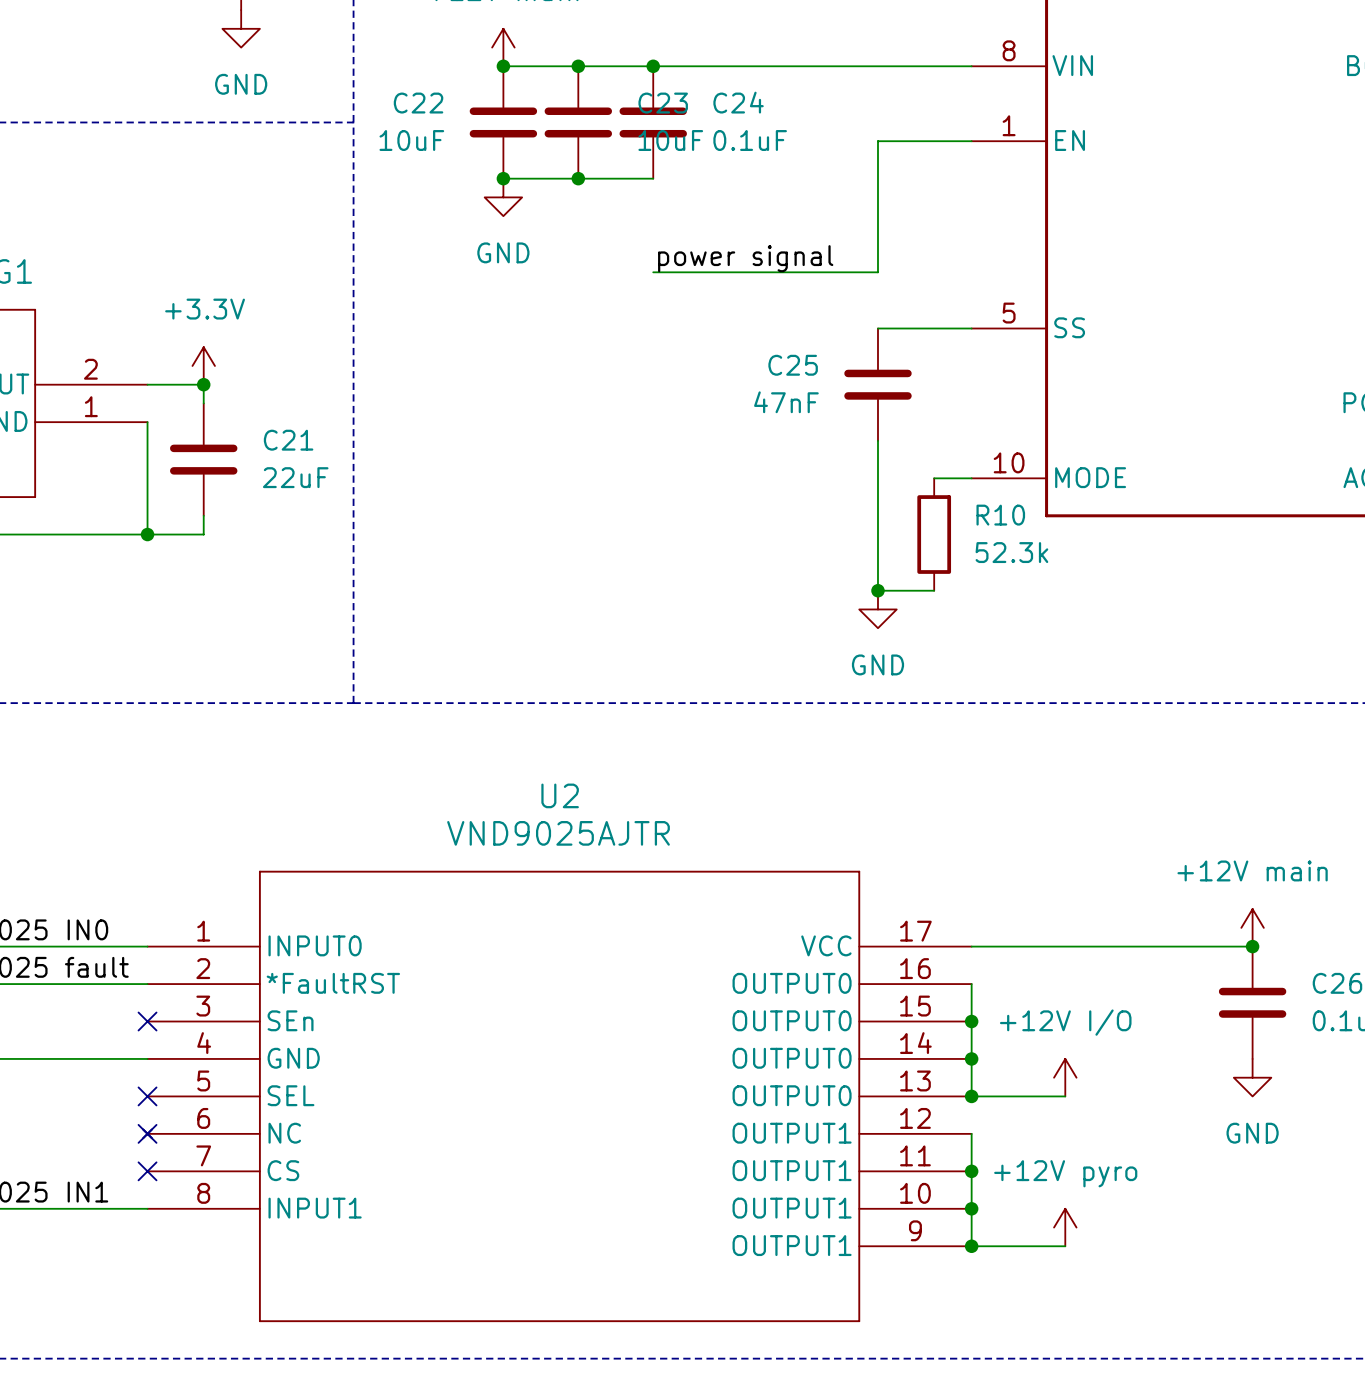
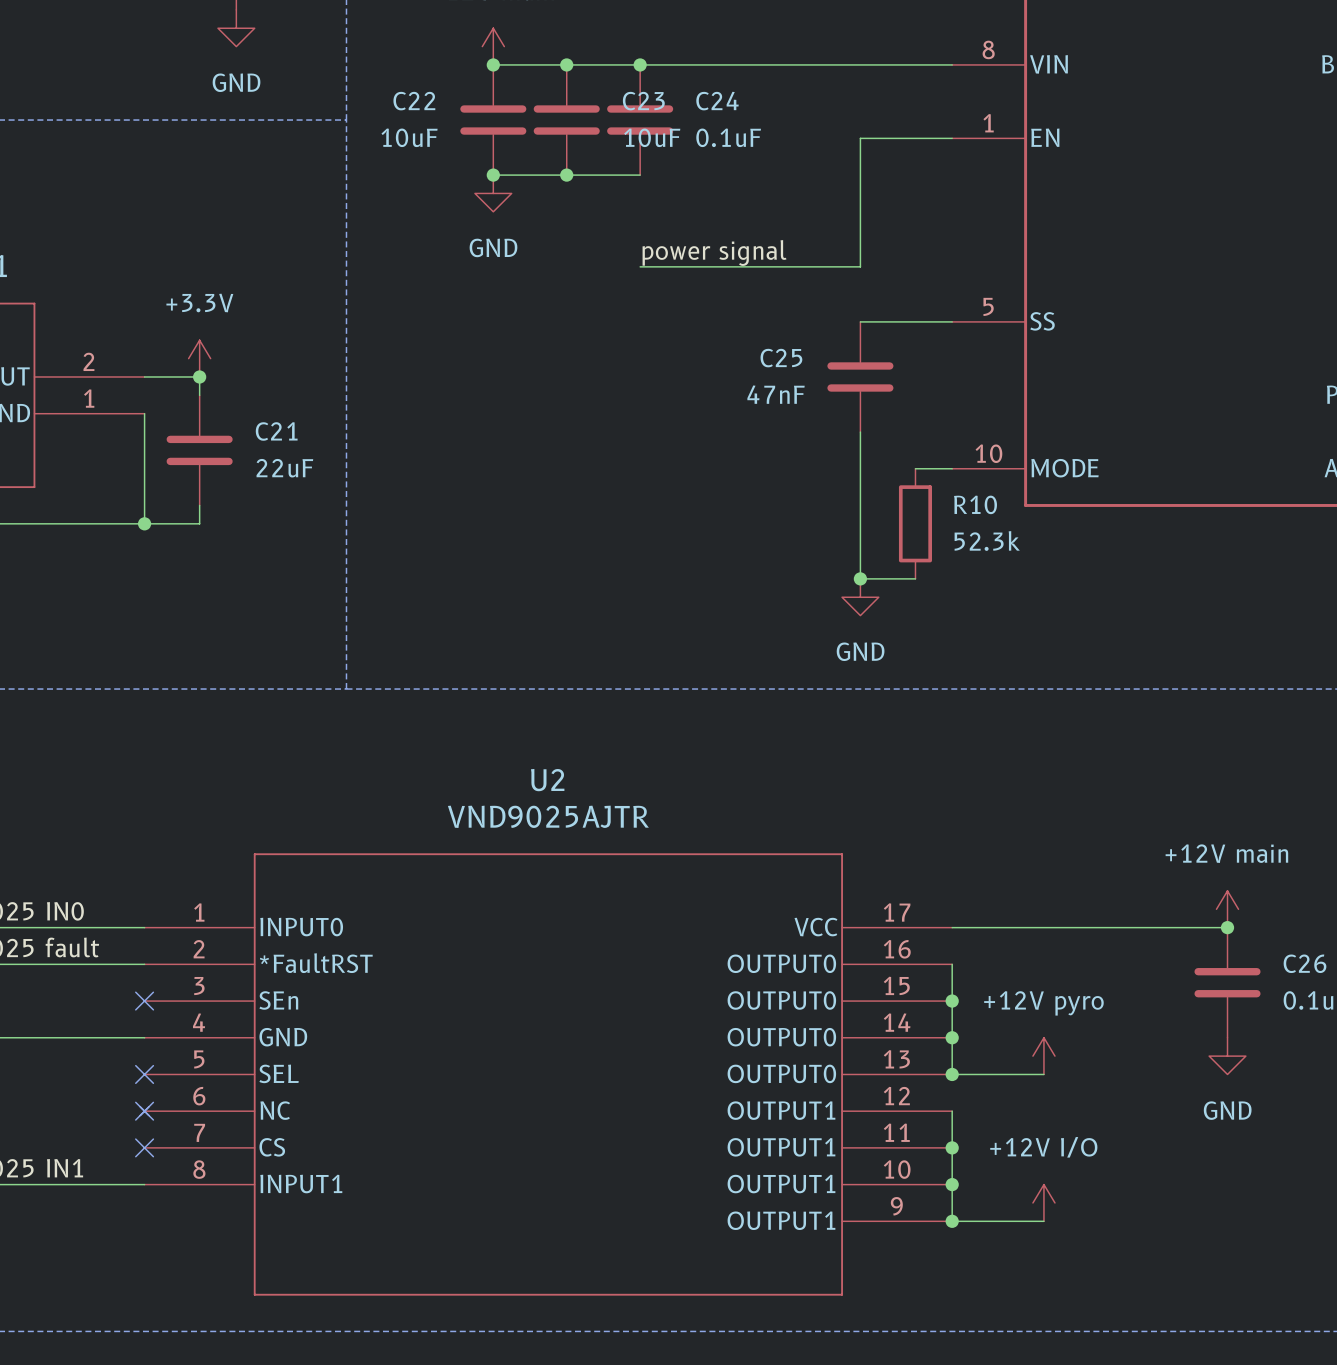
power symbol: +12V I/O (1065, 1077) -> +12V pyro (1043, 1056)
power symbol: +12V pyro (1065, 1227) -> +12V I/O (1043, 1202)

